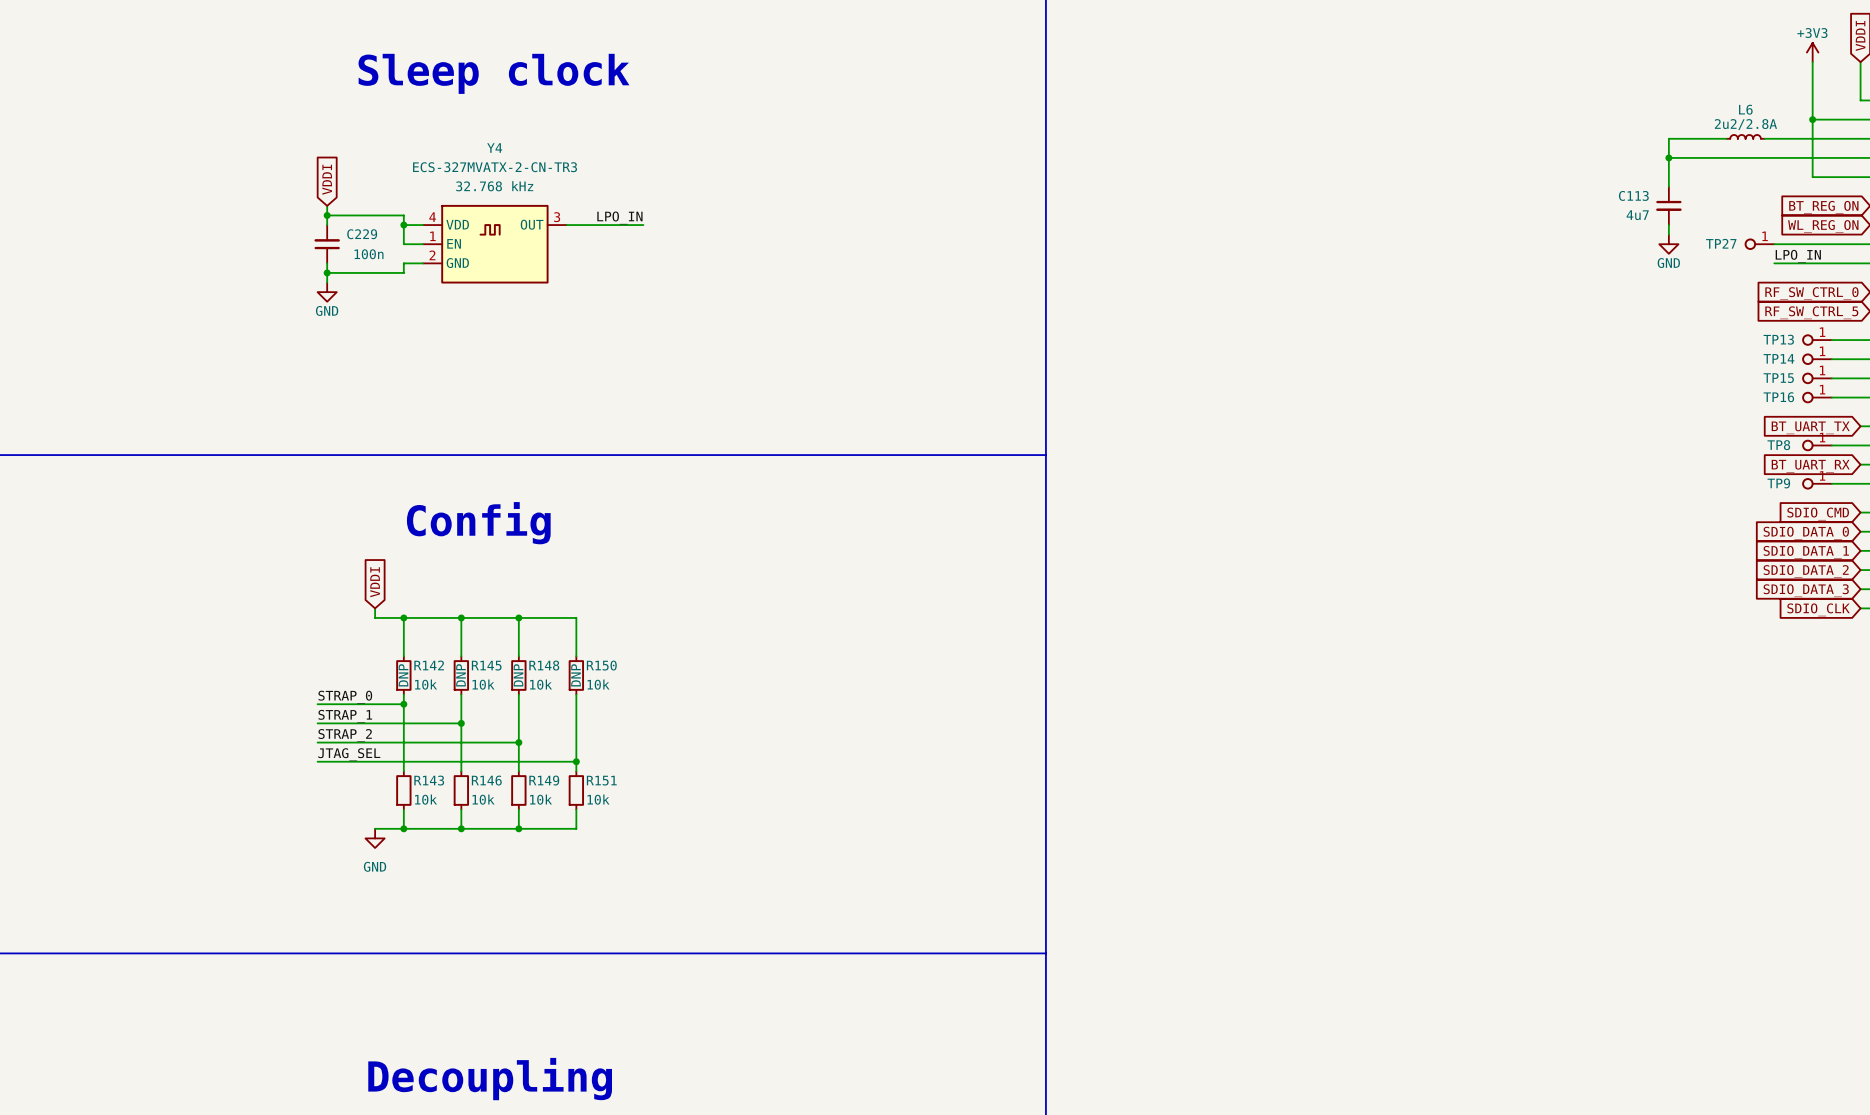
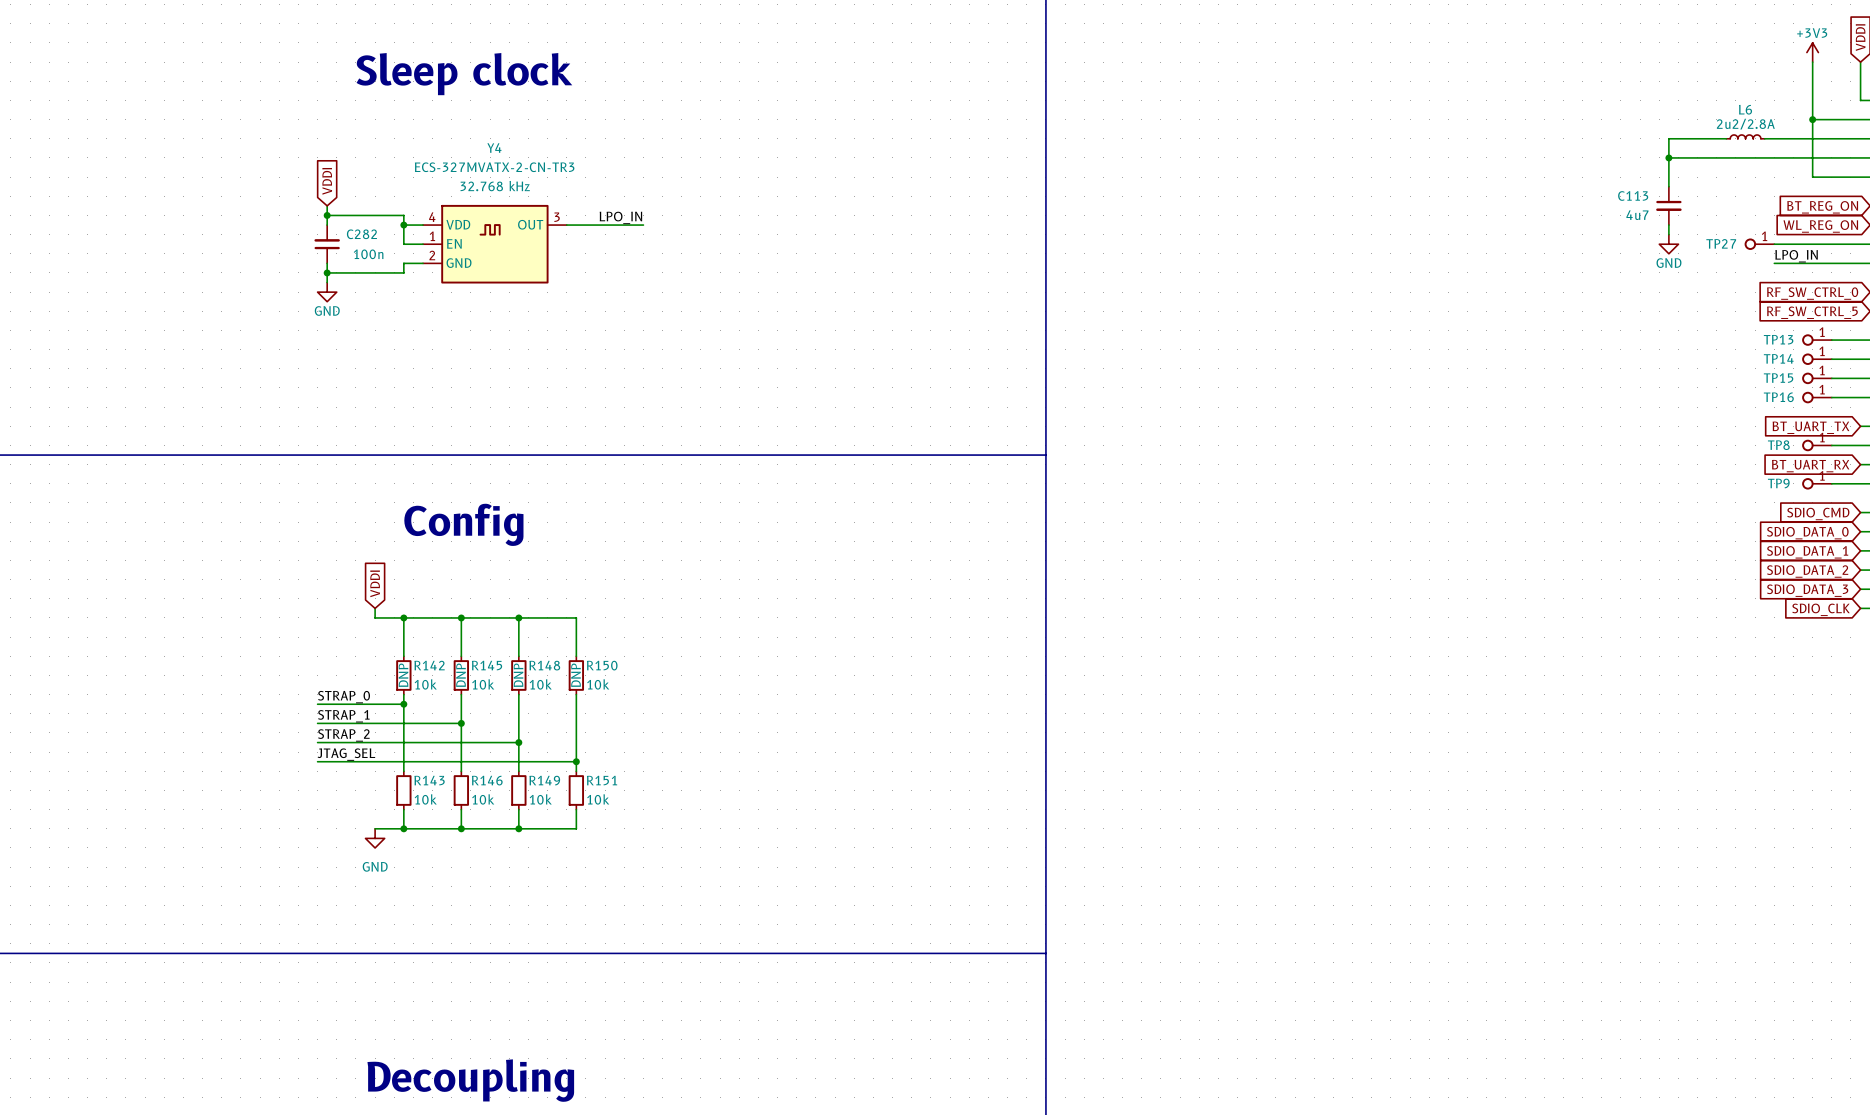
C229 name: C229 (362, 234) -> C282 (361, 234)

